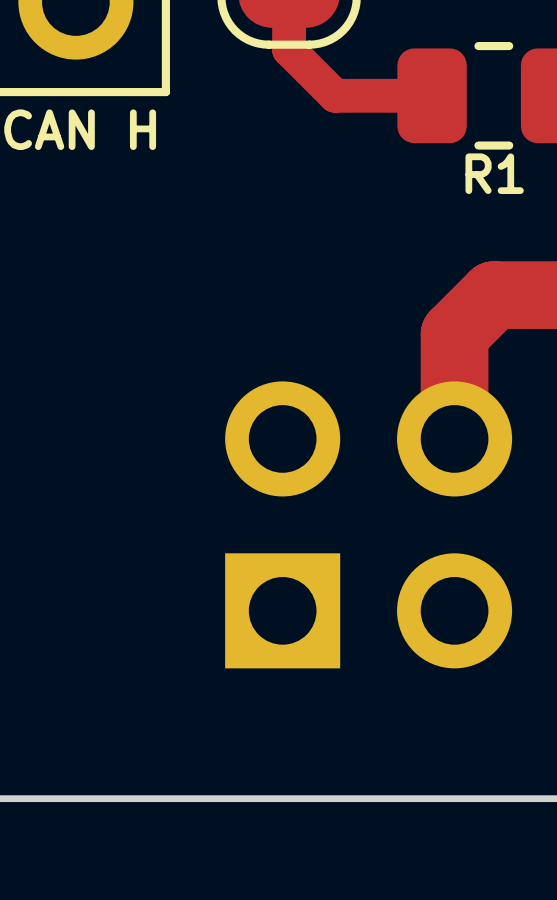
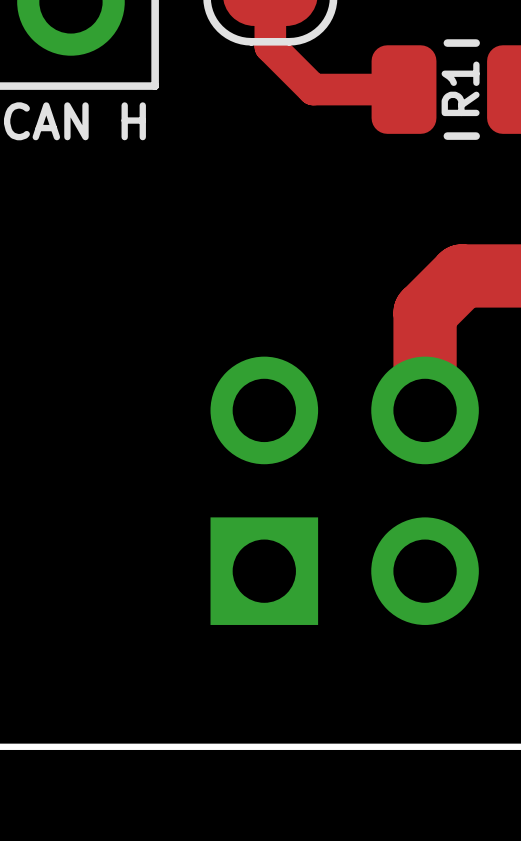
R1 name rotation: 0° (494, 173) -> 90° counterclockwise (460, 88)

